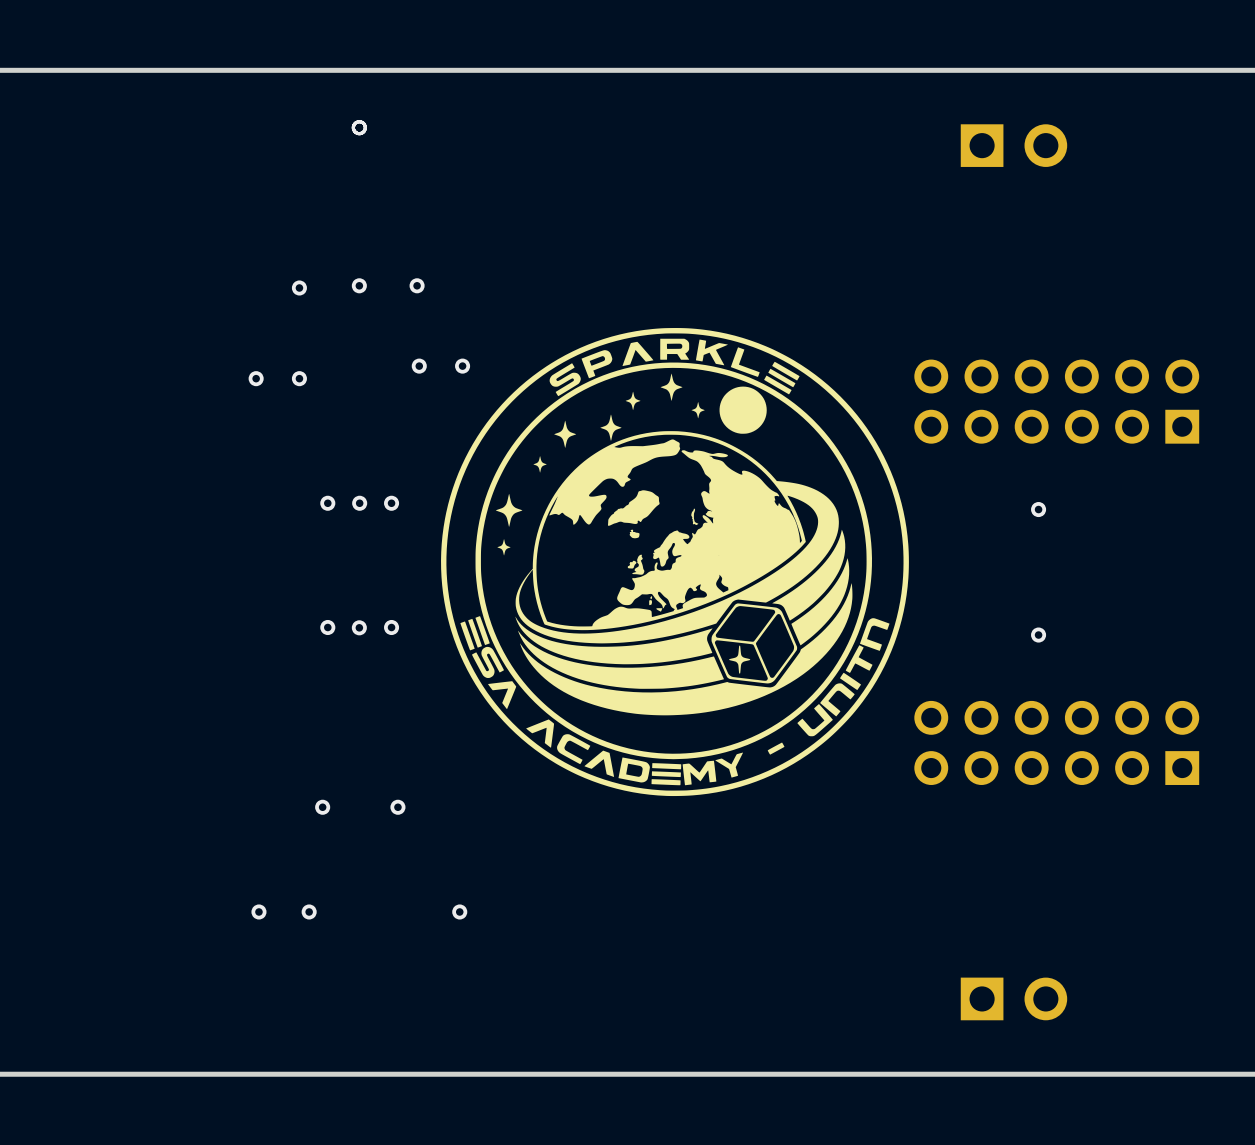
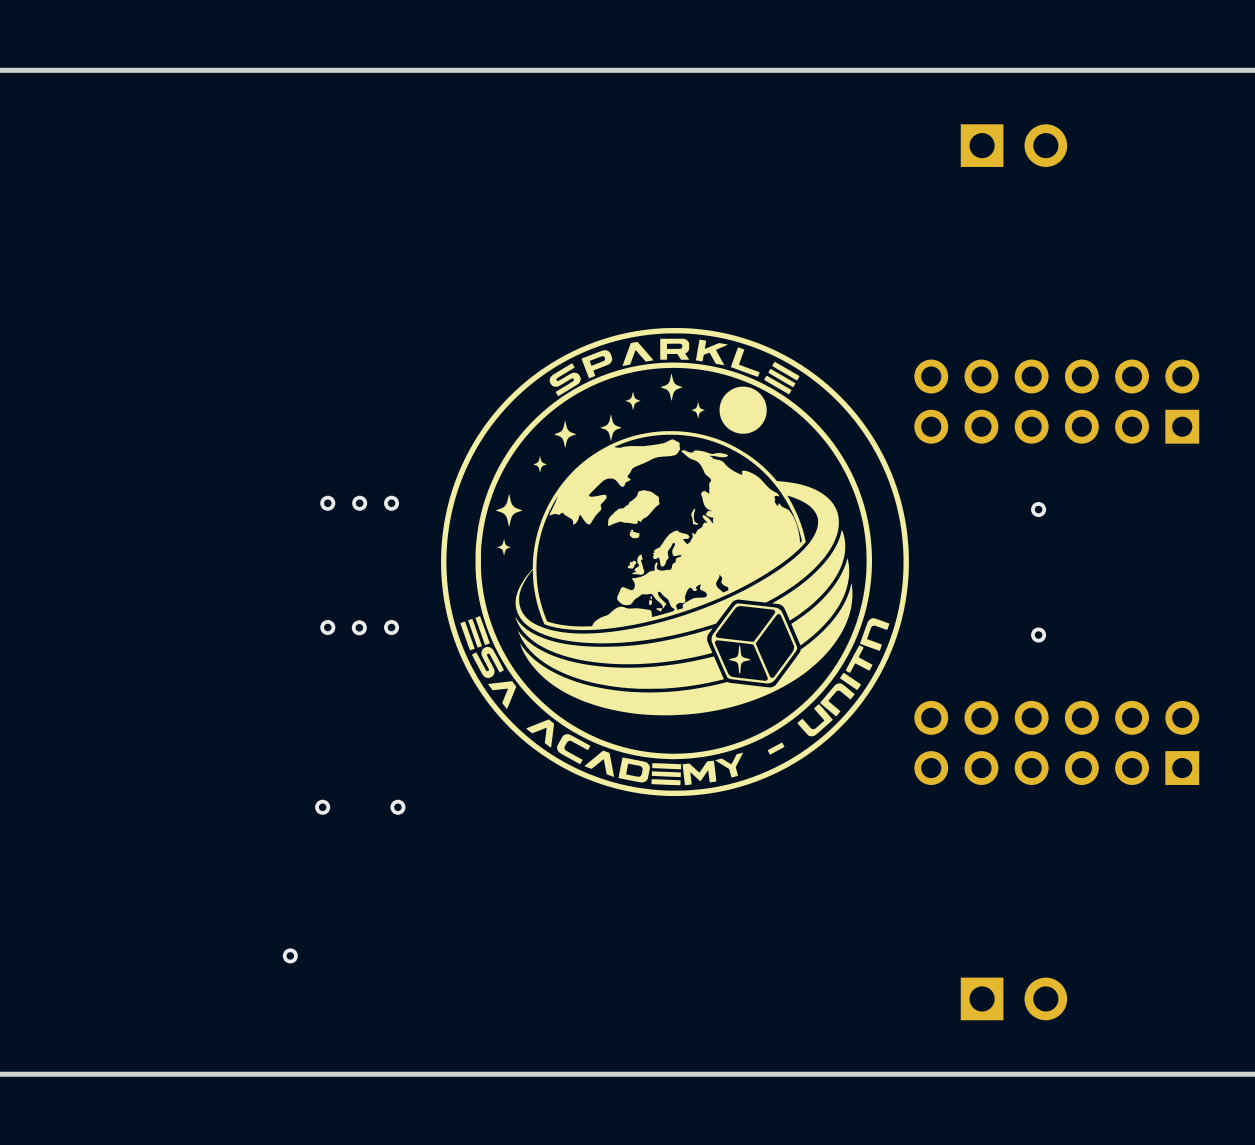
via: (359, 127) -> none
via: (359, 285) -> none
via: (417, 285) -> none
via: (299, 287) -> none
via: (419, 366) -> none
via: (462, 366) -> none
via: (256, 378) -> none
via: (299, 378) -> none
via: (258, 911) -> none
via: (309, 911) -> none
via: (459, 911) -> none
via: none -> (290, 955)

